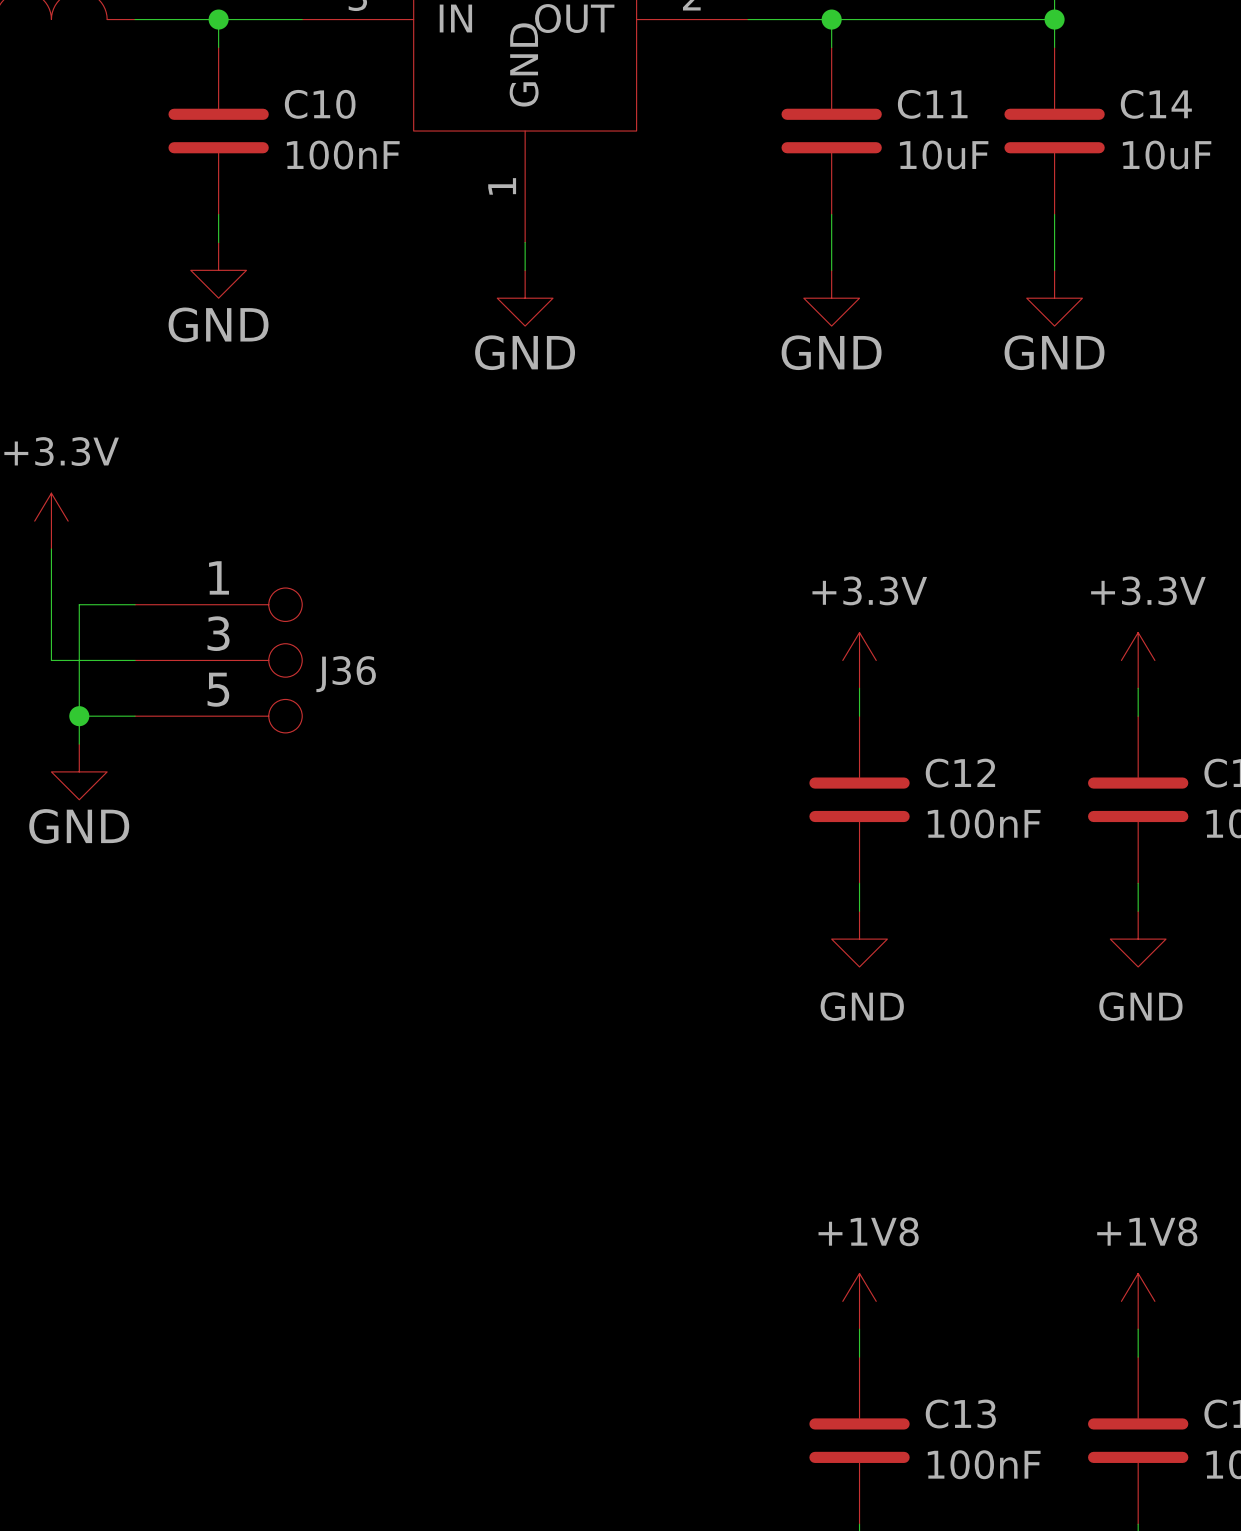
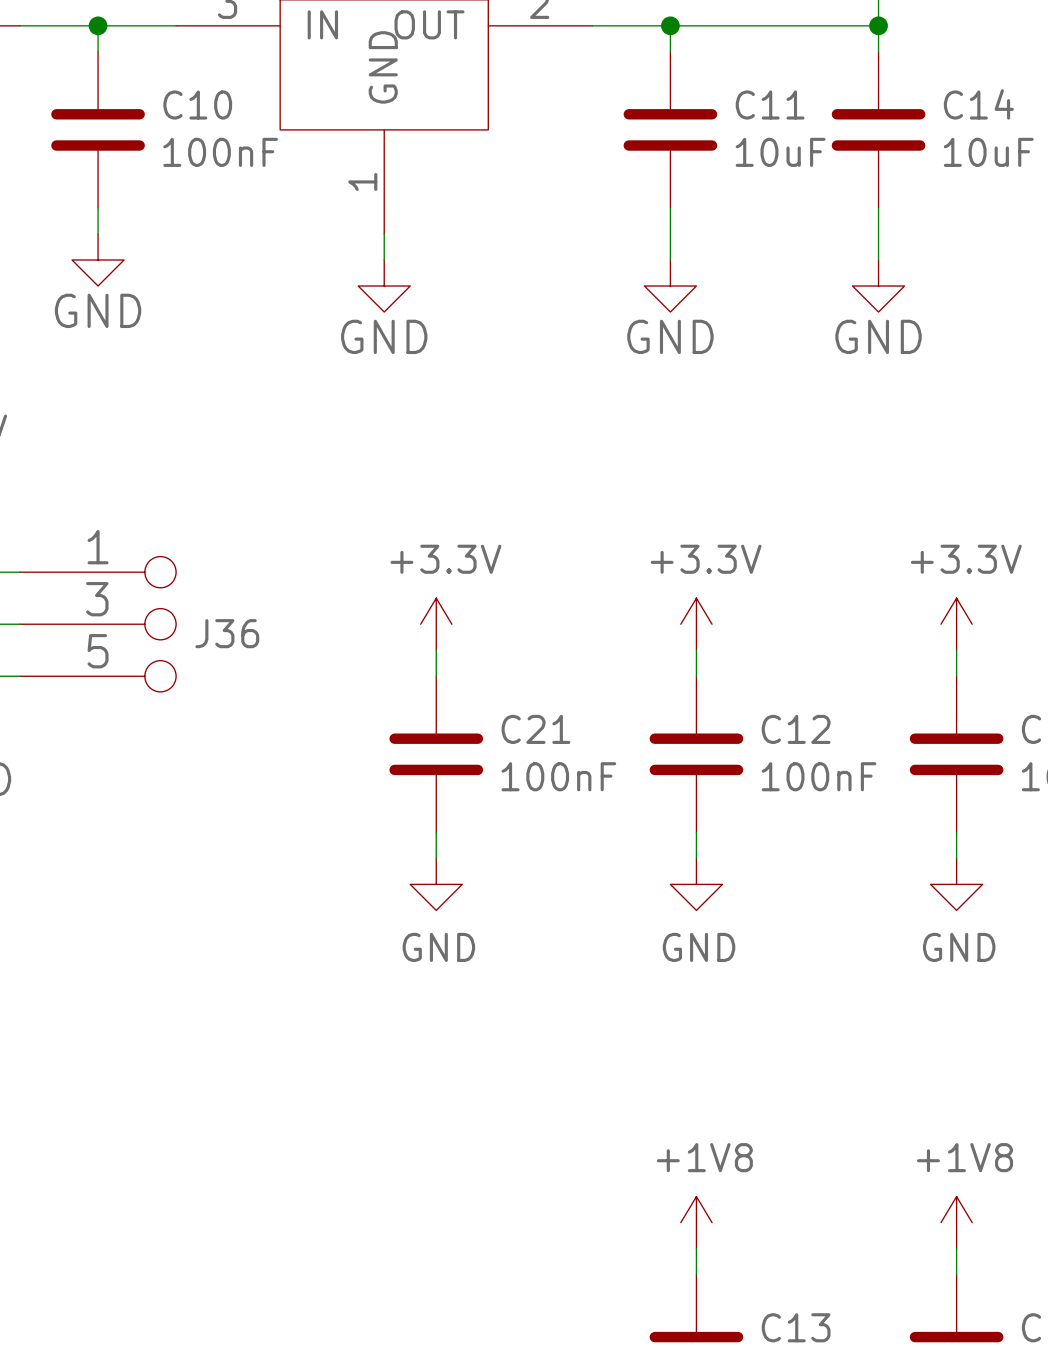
power symbol: none -> +3.3V (436, 624)
wire: none -> (436, 650) (436, 676)
C21: none -> 100nF (436, 754)
wire: none -> (436, 832) (436, 858)
power symbol: none -> GND (436, 884)

